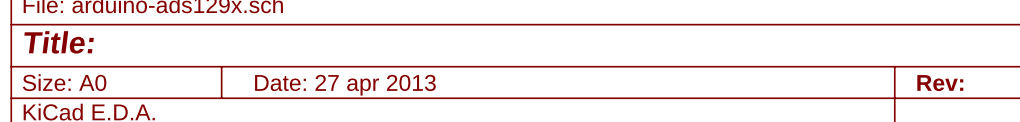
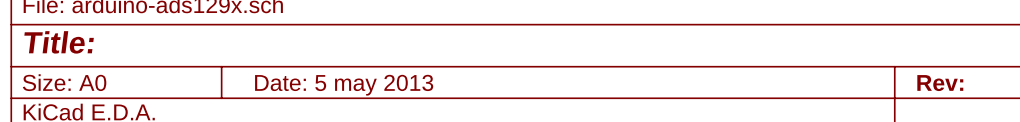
title block: Date: 27 apr 2013 (345, 85) -> Date: 5 may 2013 (344, 85)

